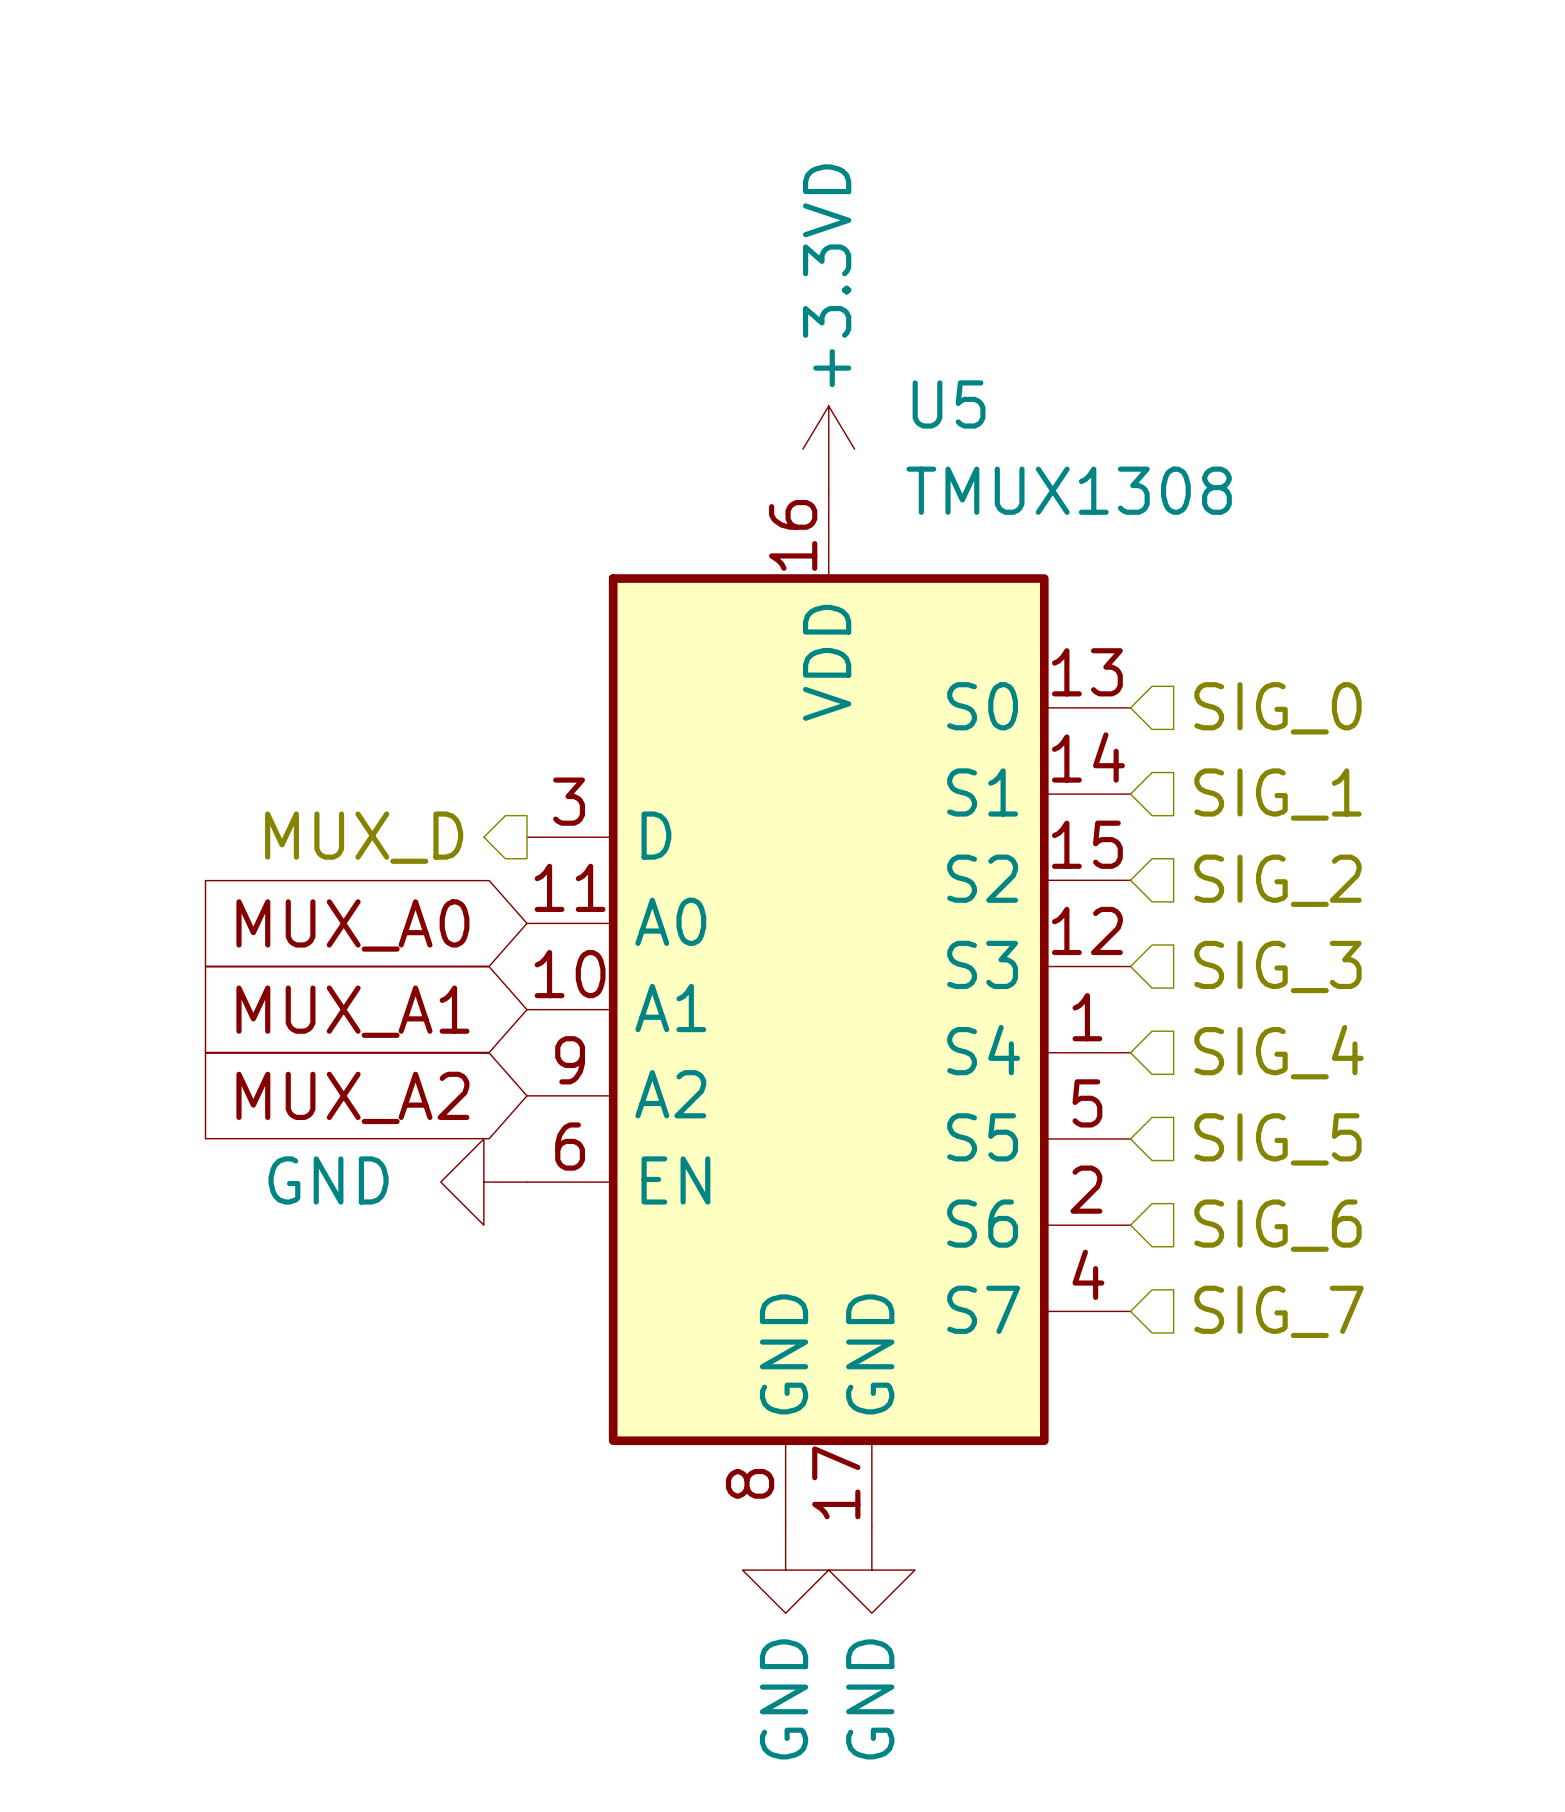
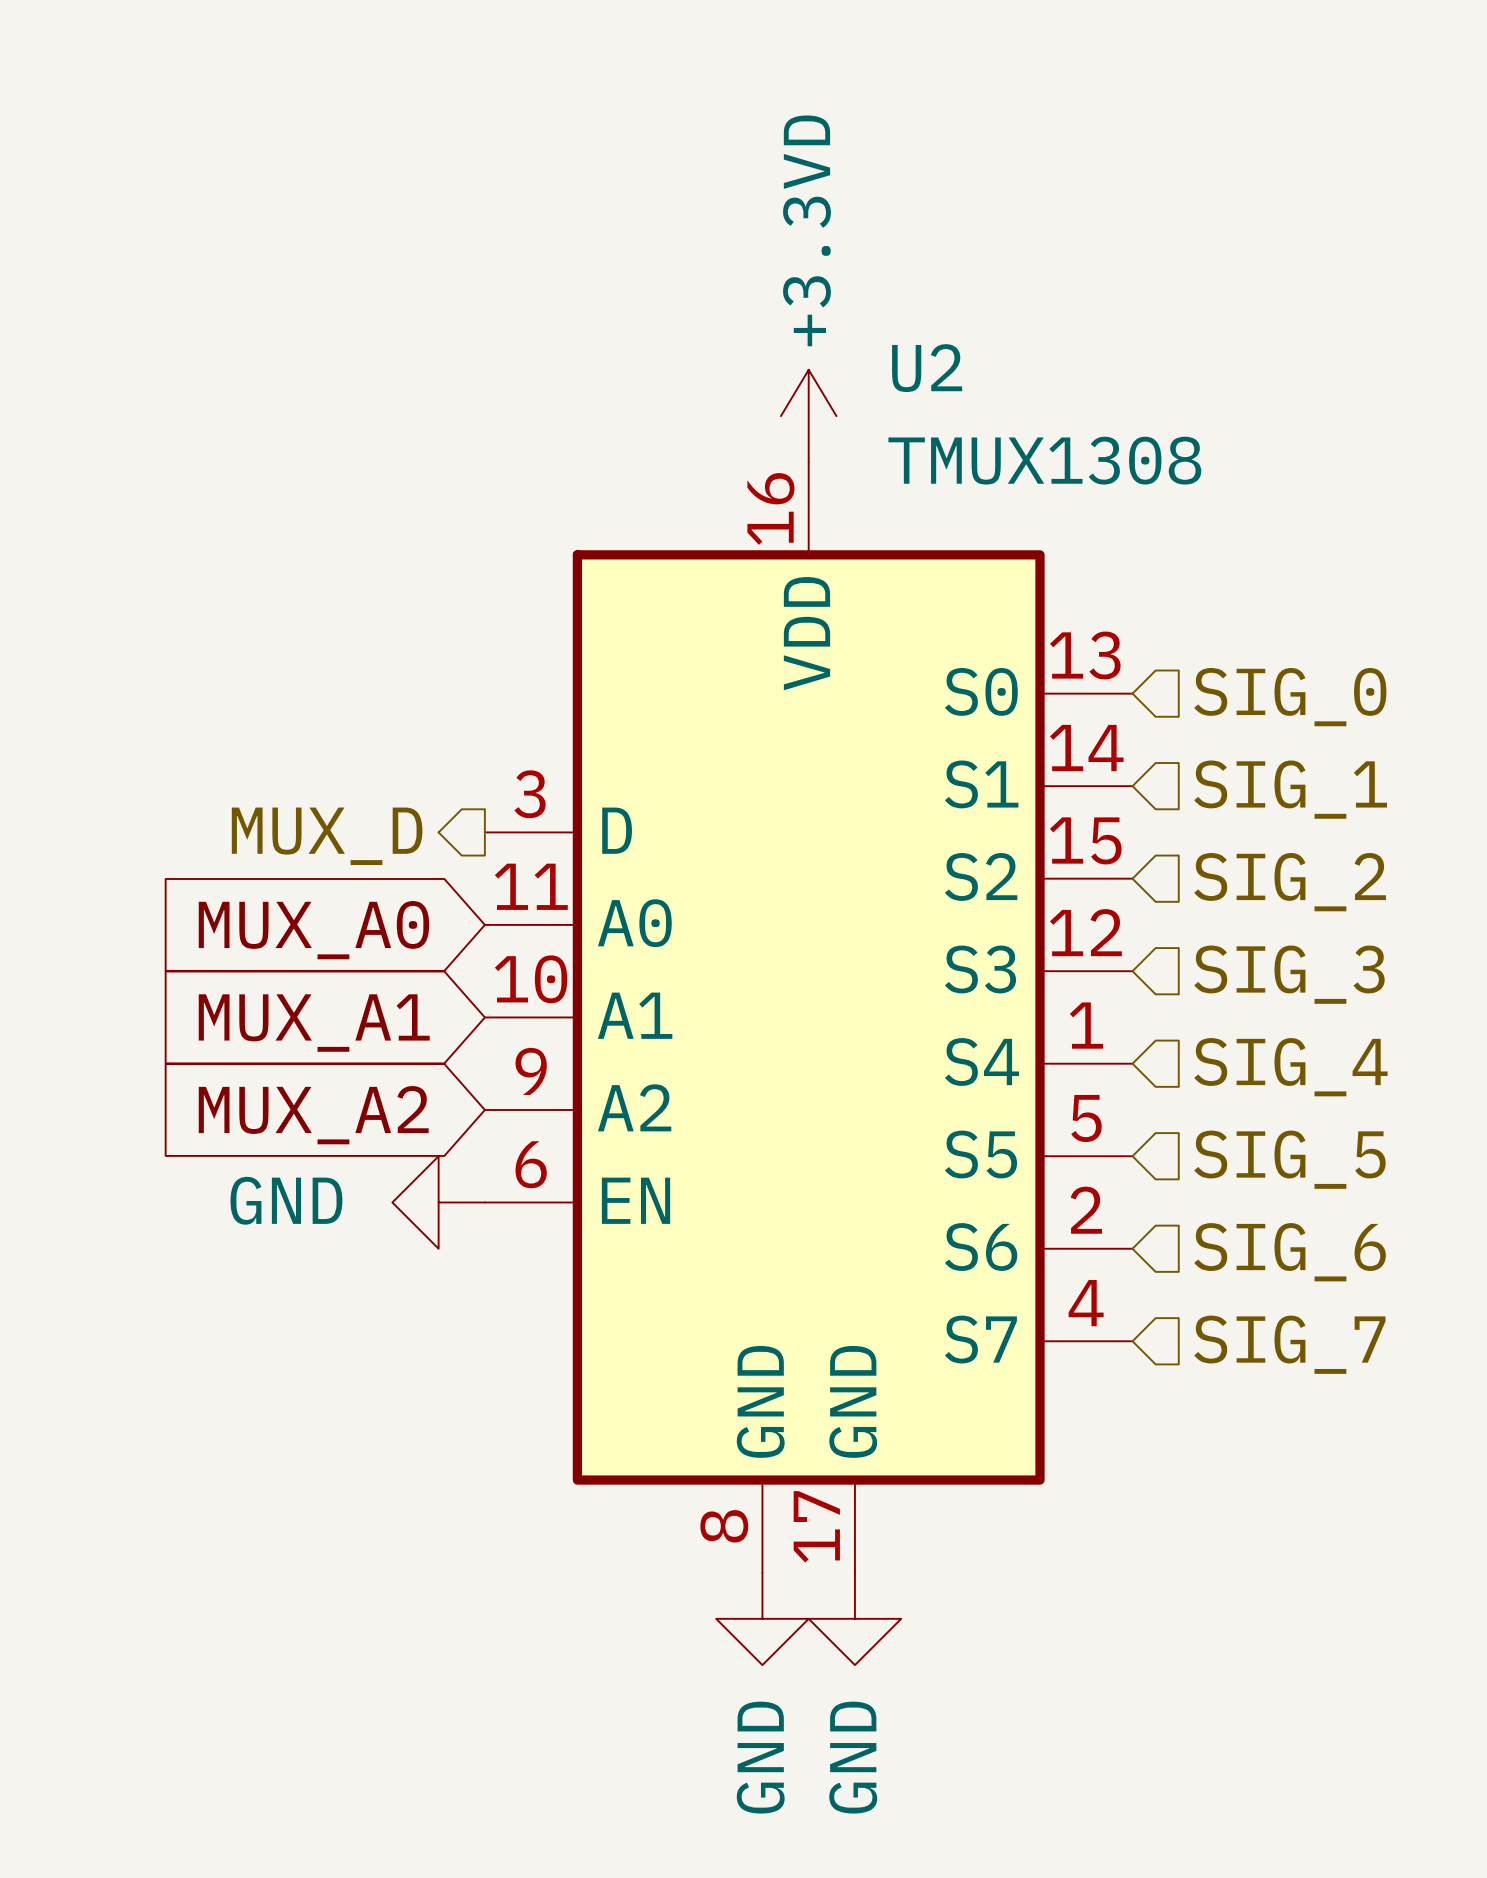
U5 name: U5 (949, 404) -> U2 (927, 368)

